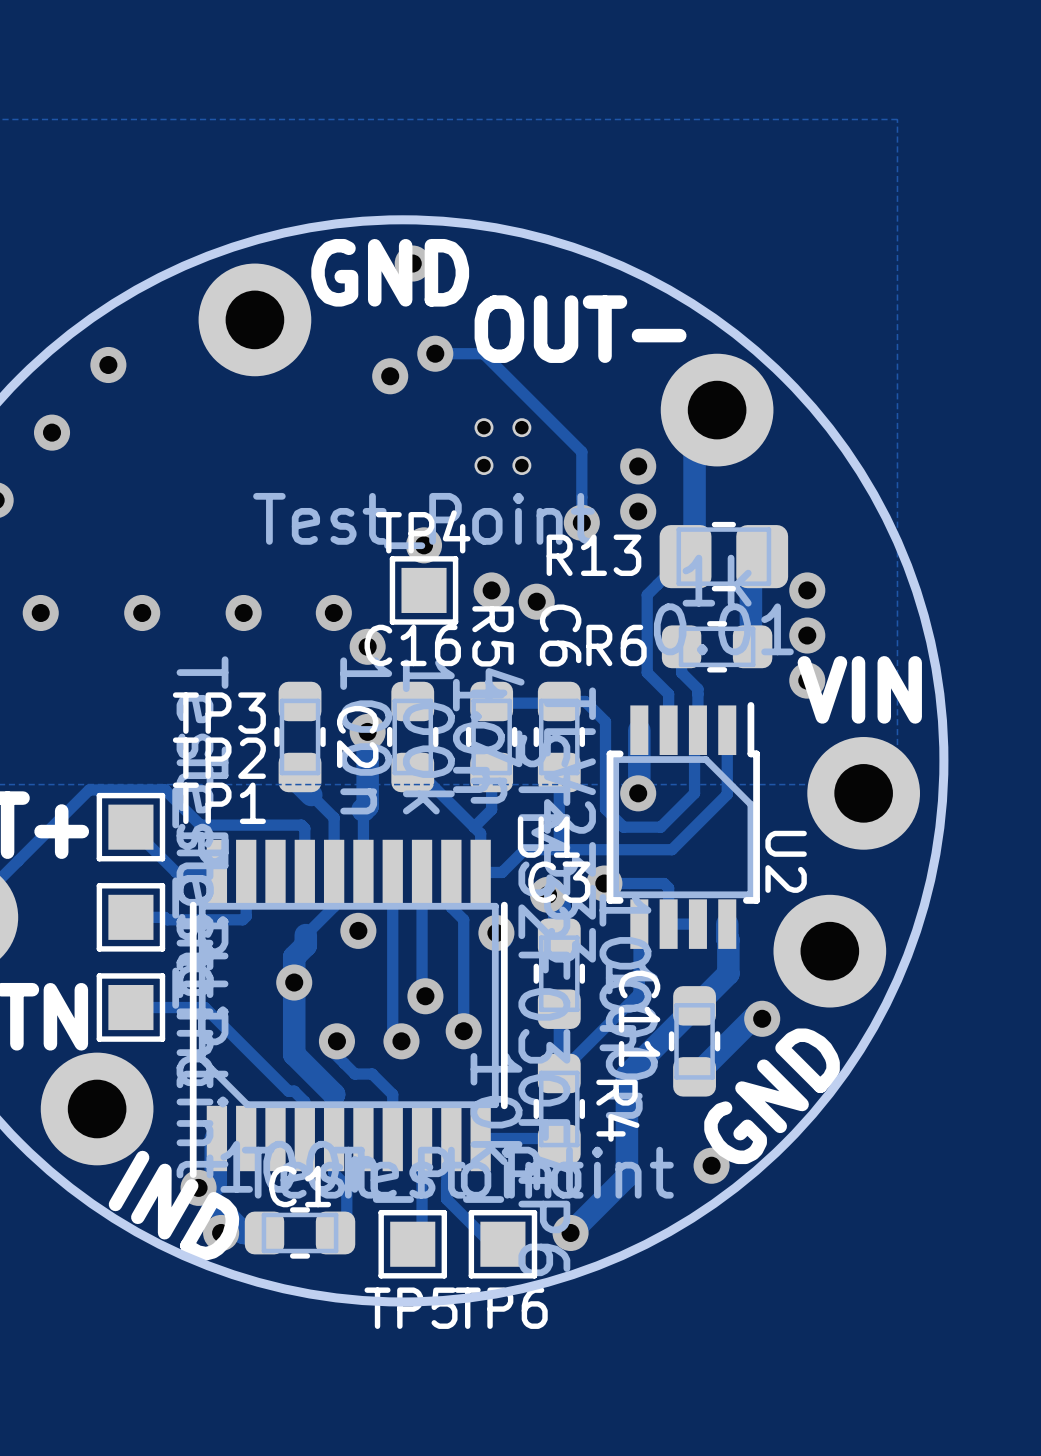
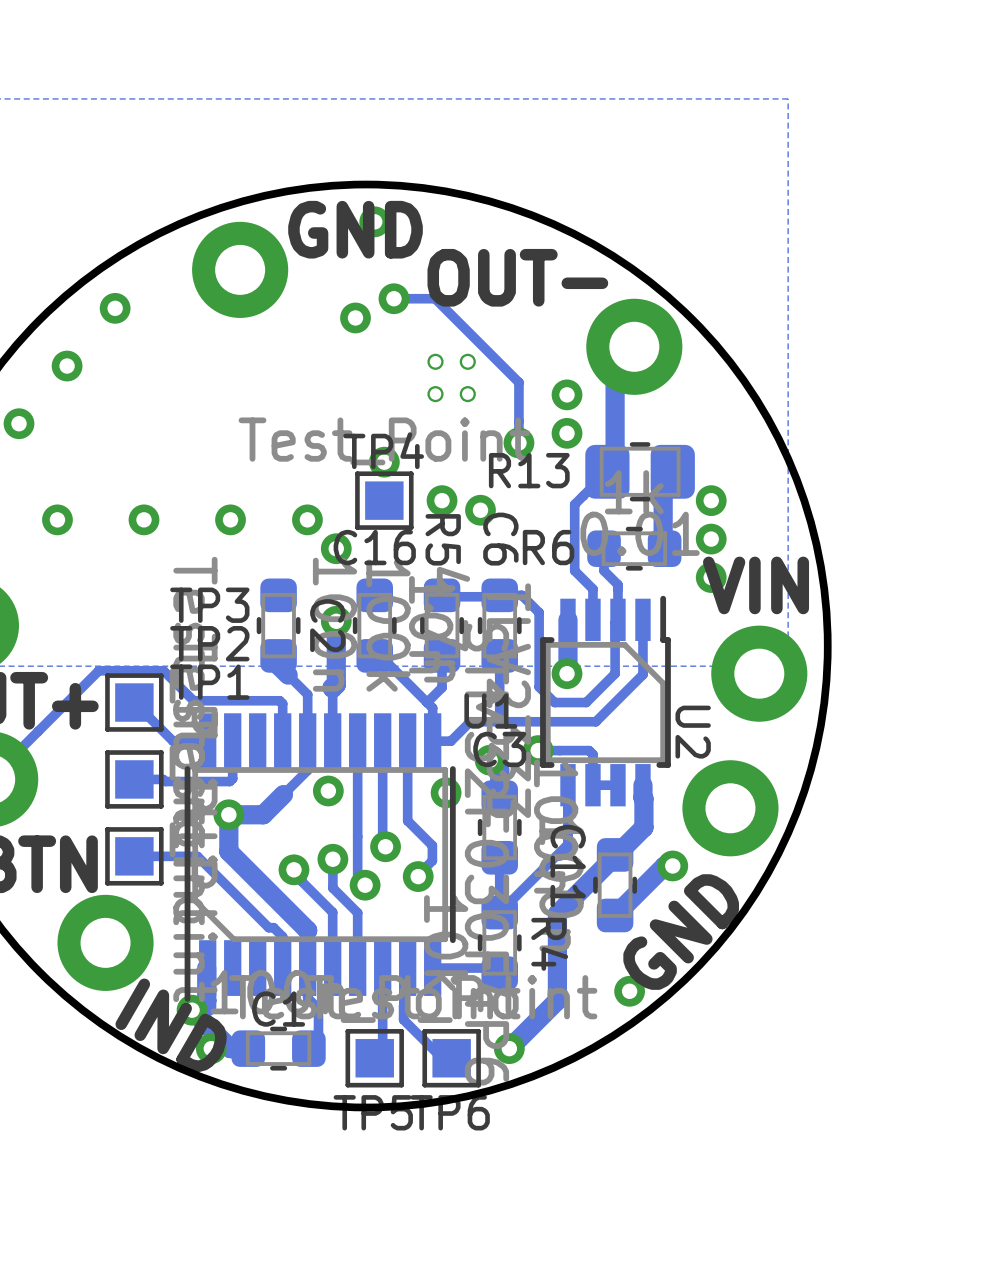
track: (451, 907) (463, 919) (463, 1031) -> (407, 770) (407, 820) (432, 845) (432, 860) (417, 876)
track: (305, 935) (305, 945) (294, 957) (294, 1054) -> (228, 814) (228, 851) (273, 896)
track: none -> (283, 794) (263, 814) (228, 814)
via: none -> (228, 814)
via: (294, 982) -> none
via: none -> (332, 859)
track: none -> (293, 869) (301, 877) (301, 881) (332, 912) (332, 968)
via: none -> (293, 869)
via: (336, 1041) -> none
track: (326, 1045) (354, 1074) (372, 1074) (392, 1094) -> (332, 859) (332, 888) (357, 912) (357, 930)

